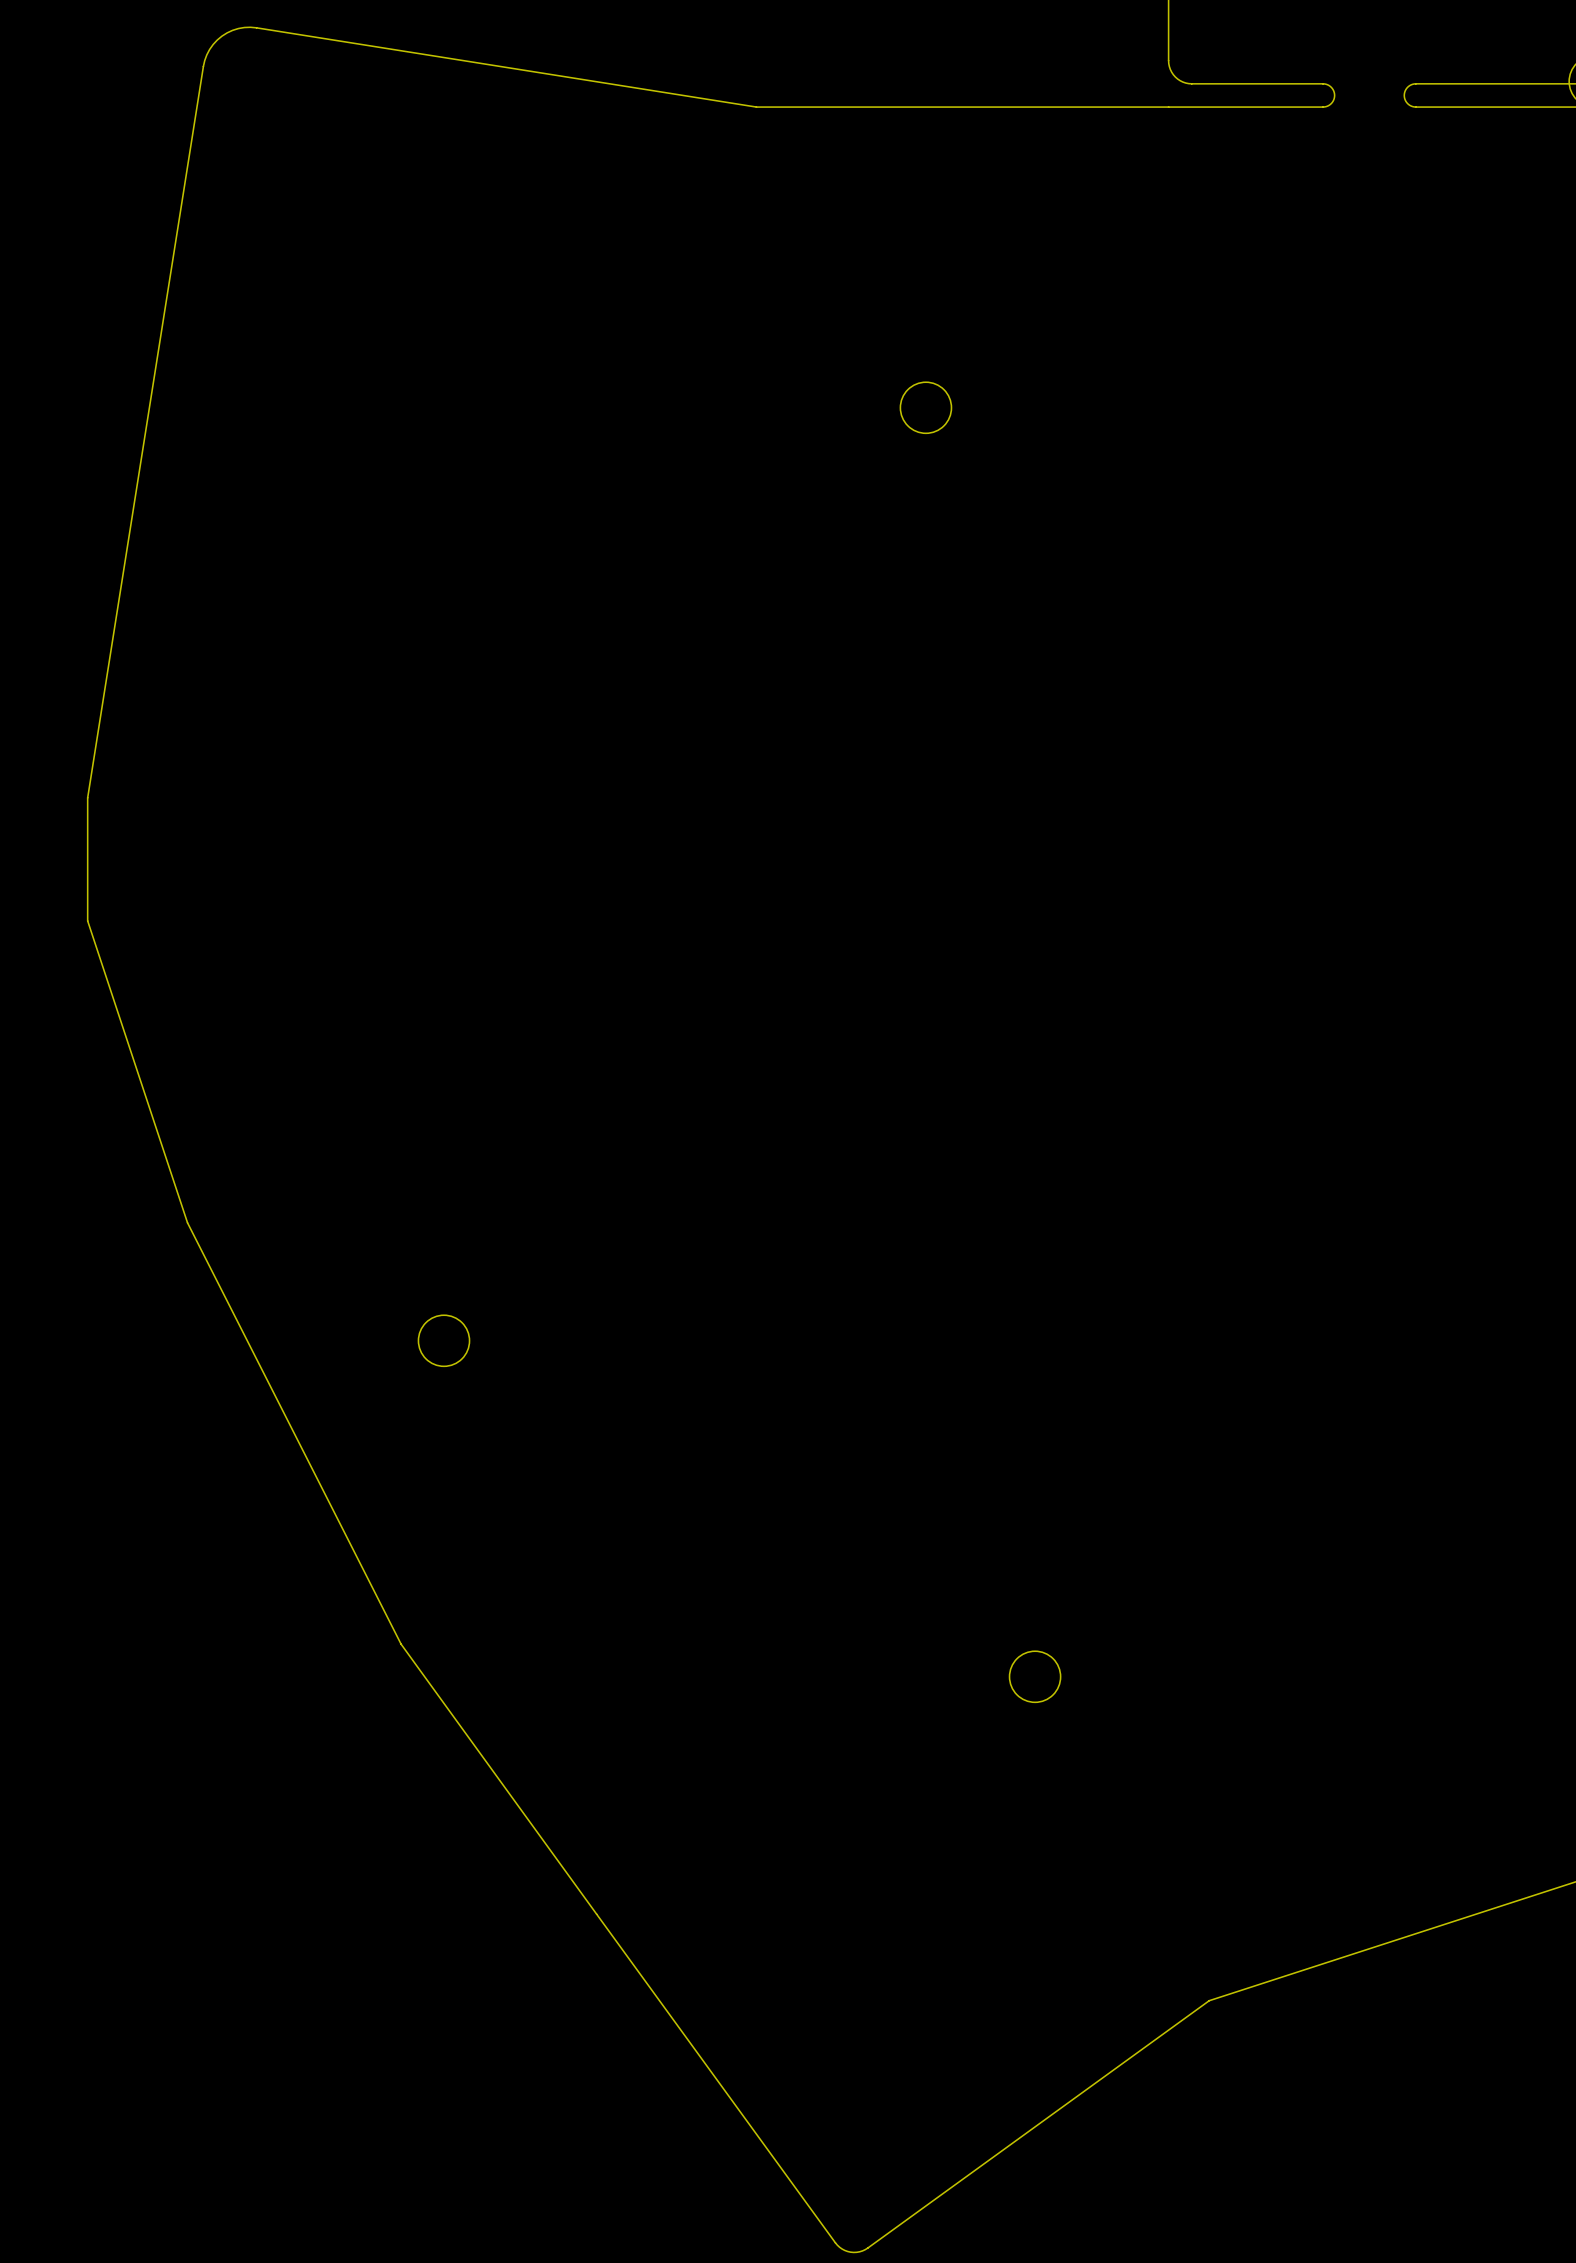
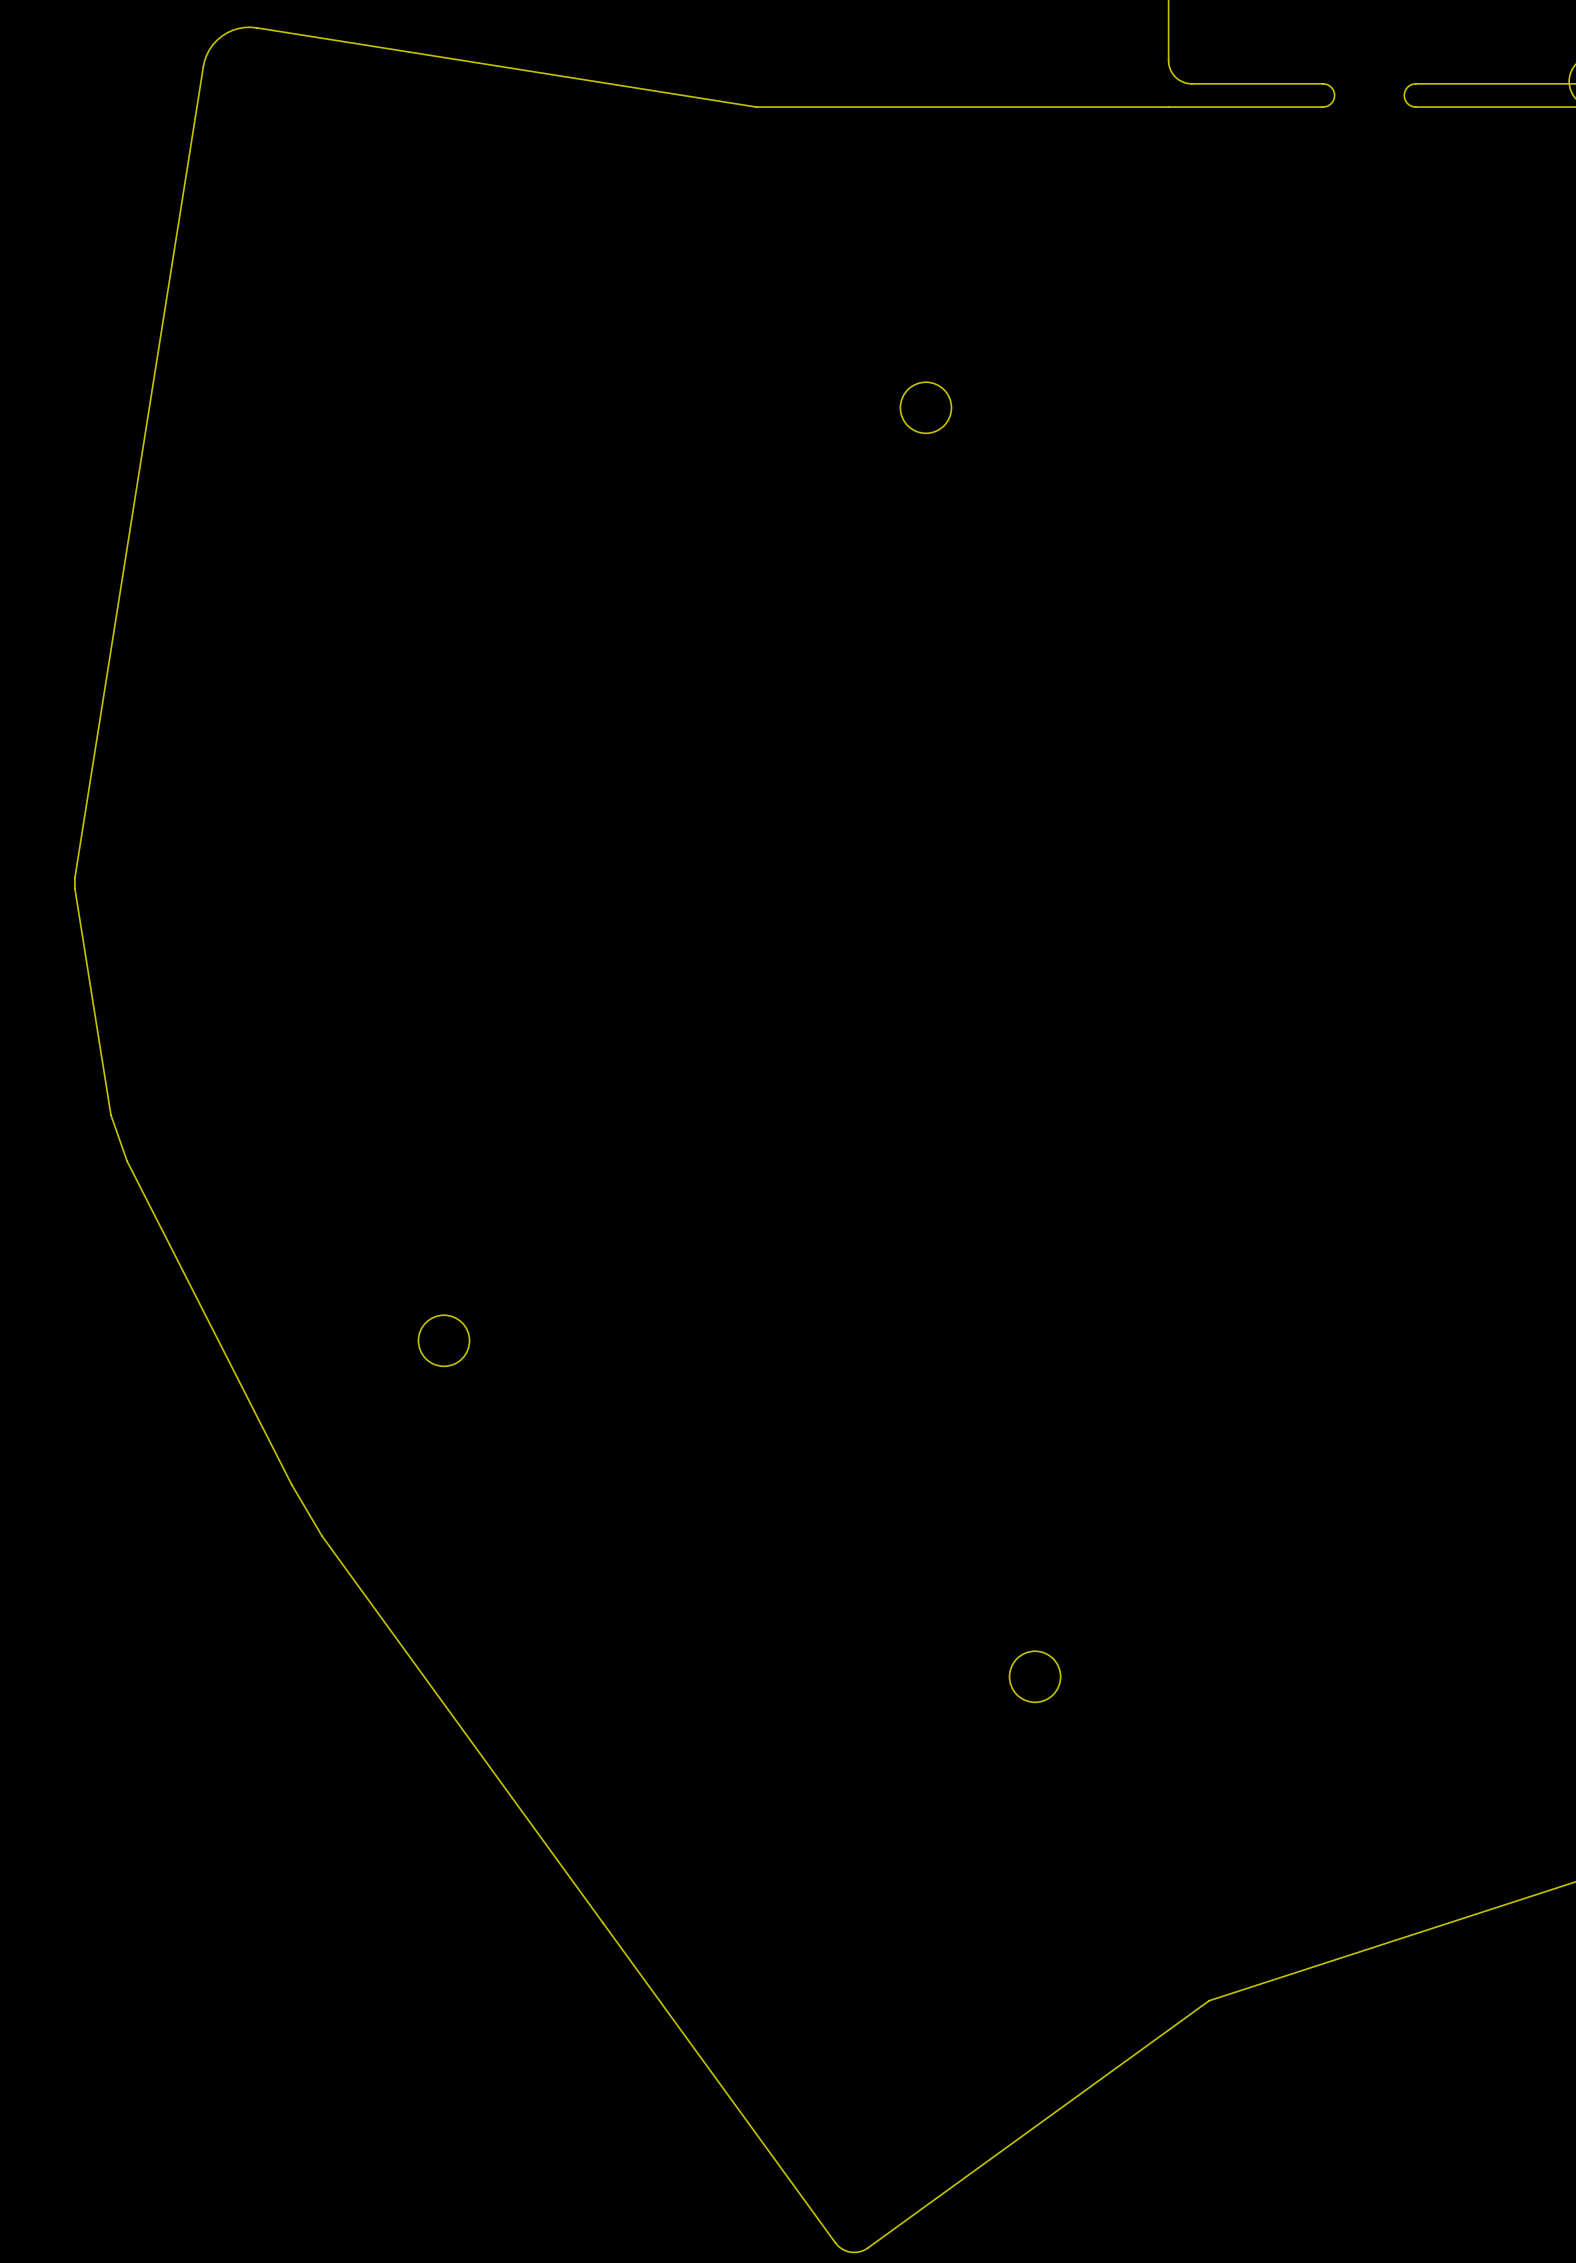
board edge: (203, 66) (87, 797) (87, 920) (187, 1222) (401, 1644) (835, 2242) -> (203, 66) (74, 877) (74, 888) (110, 1114) (127, 1161) (292, 1485) (322, 1536) (835, 2242)

